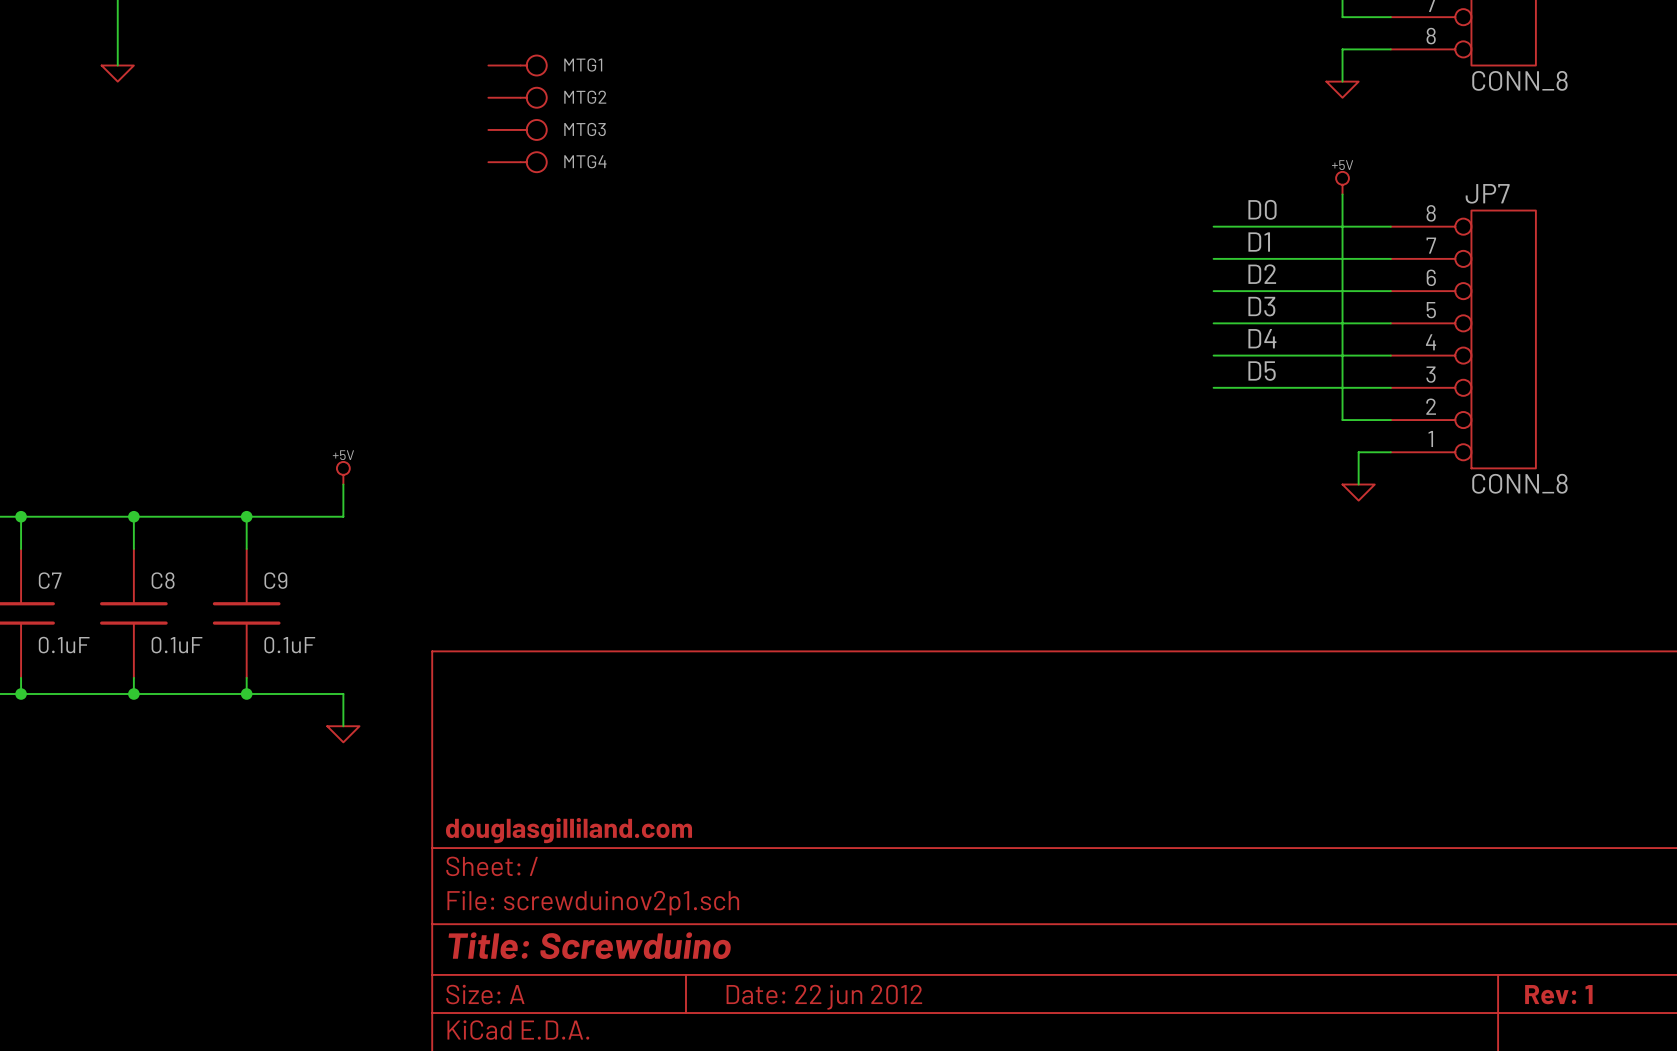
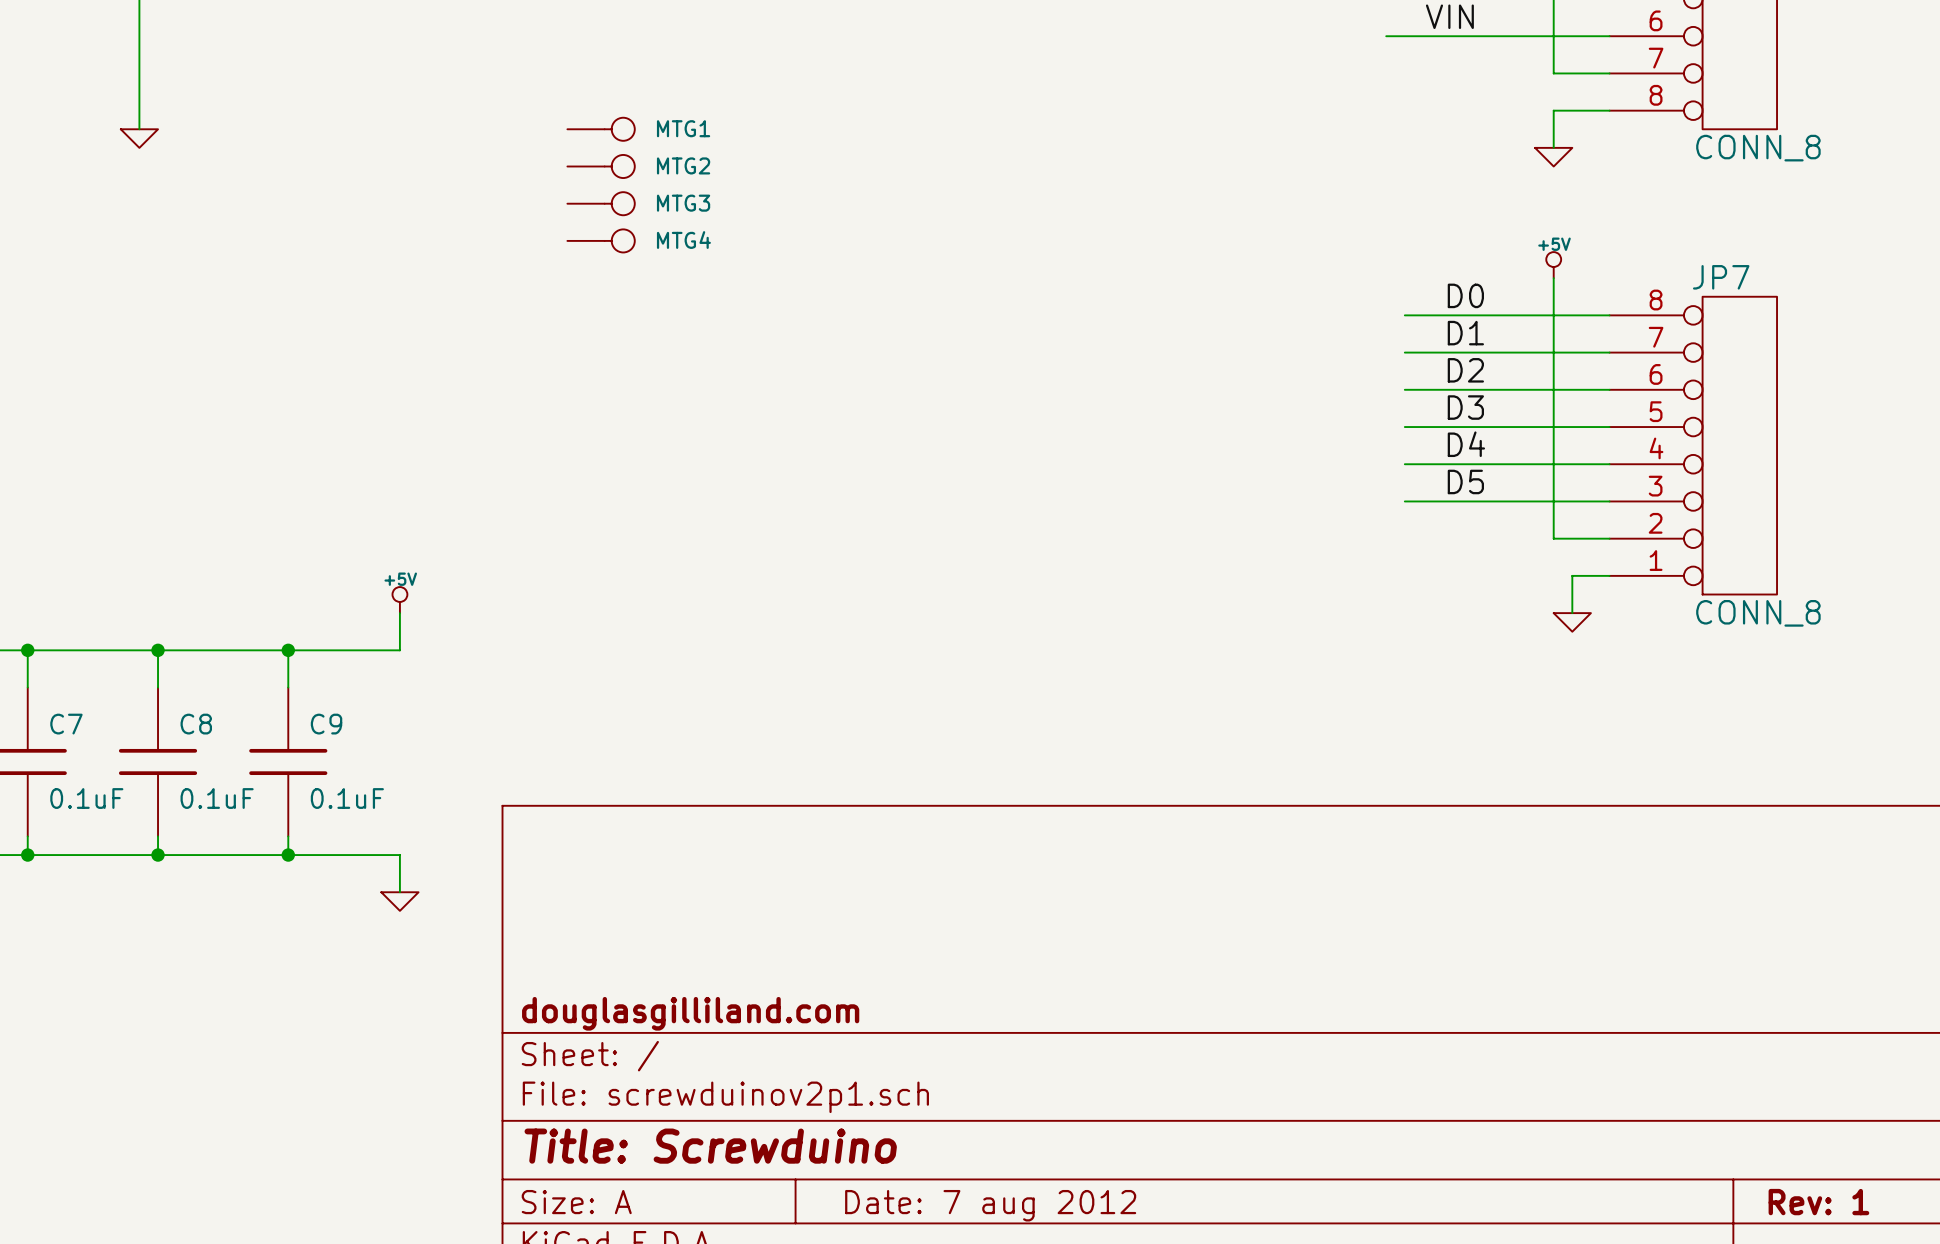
title block: Date: 22 jun 2012 (824, 997) -> Date: 7 aug 2012 (990, 1205)

